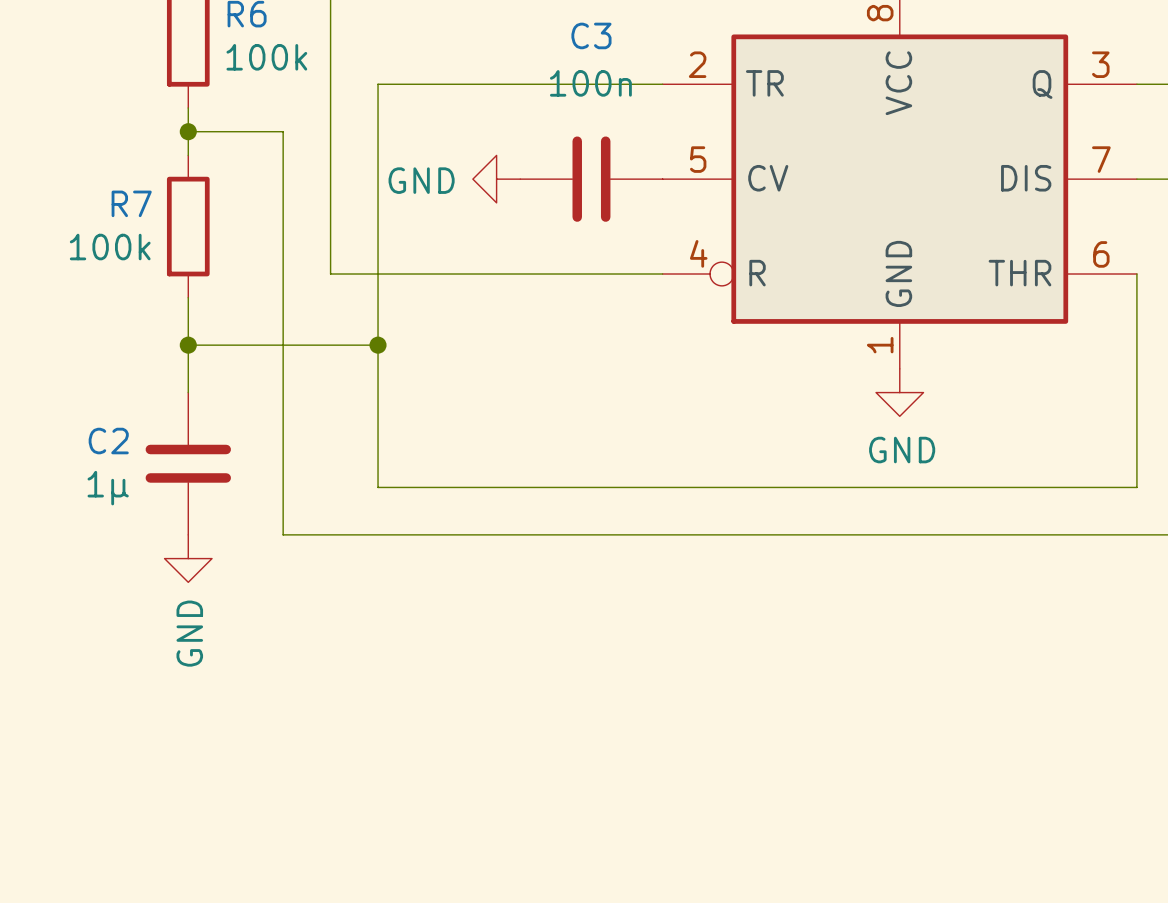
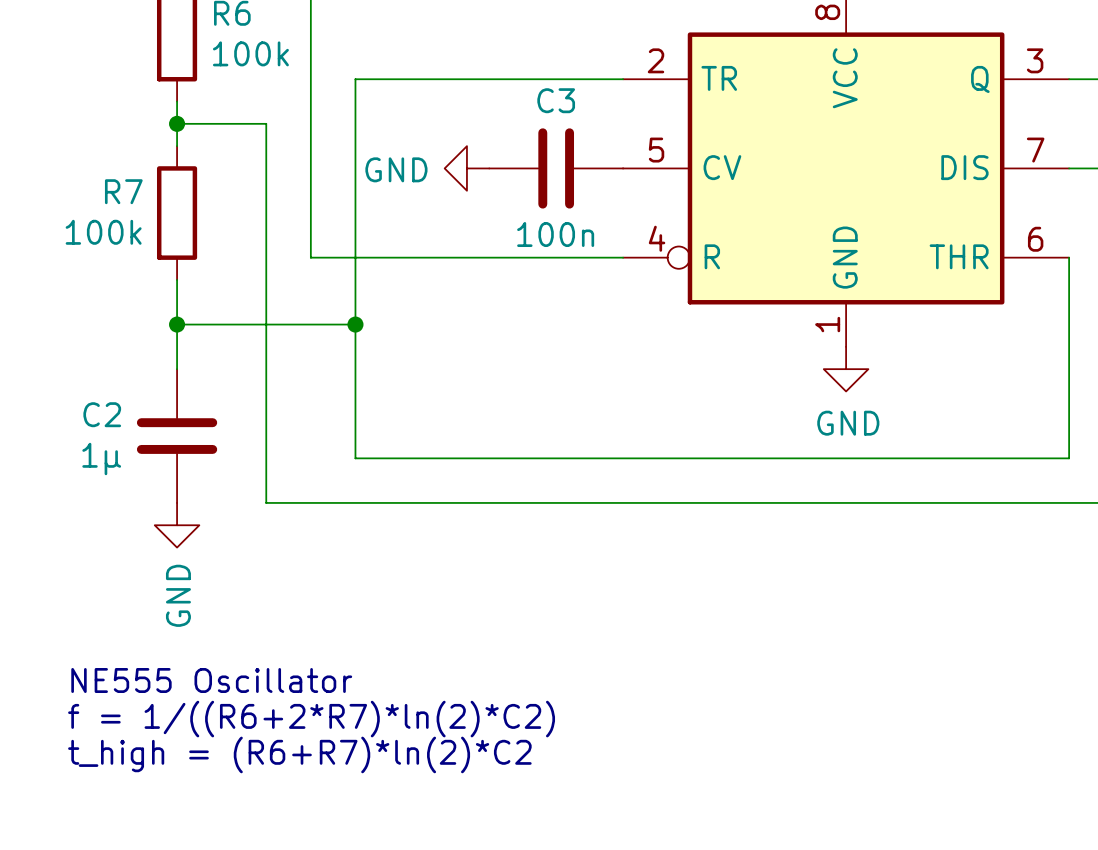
C3 name position: C3 (591, 35) -> C3 (556, 100)
C3 value position: 100n (590, 83) -> 100n (555, 234)
text: none -> NE555 Oscillator (211, 680)
text: none -> f = 1/((R6+2*R7)*ln(2)*C2) (311, 719)
text: none -> t_high = (R6+R7)*ln(2)*C2 (299, 754)

